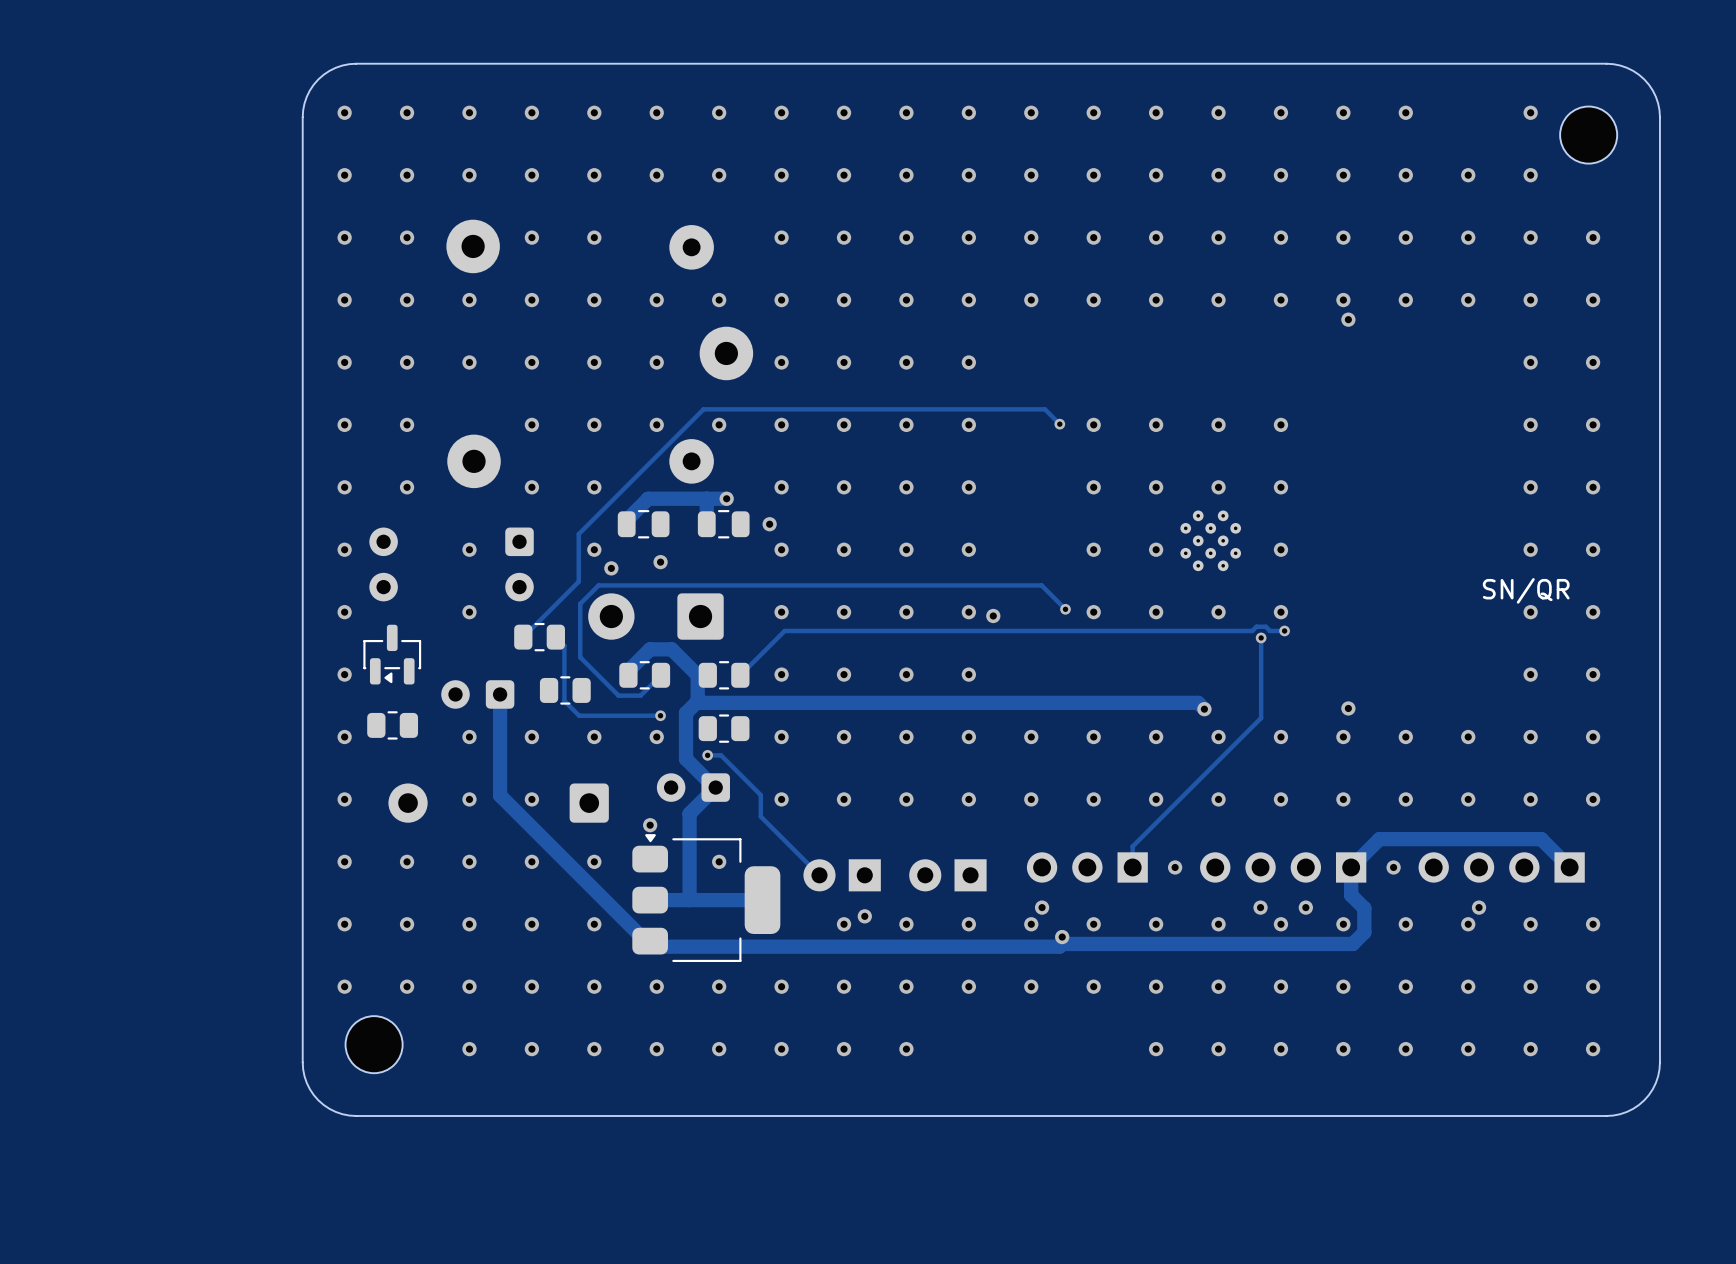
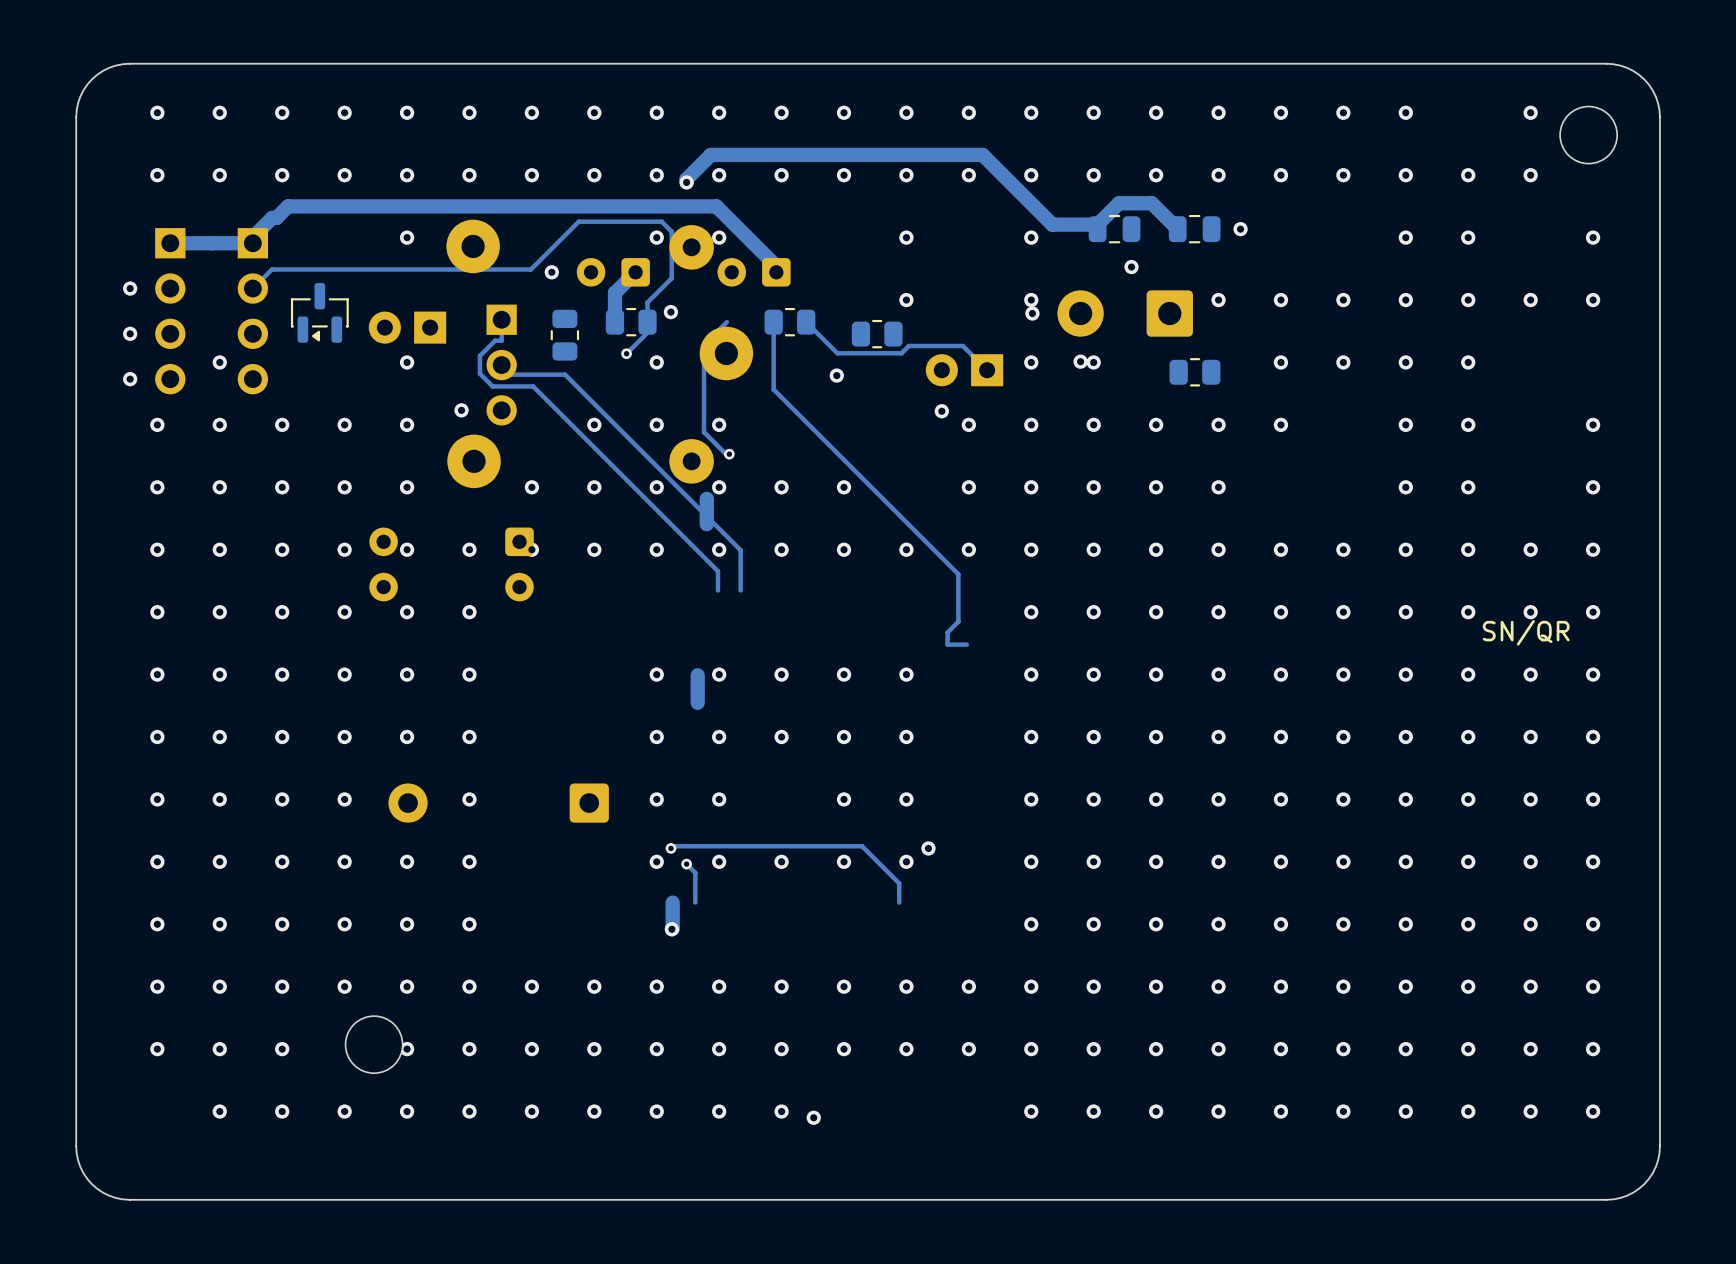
board edge: (356, 63) (335, 67) (318, 79) (306, 96) (302, 117) (302, 1062) (304, 1076) (309, 1089) (323, 1104) (335, 1111) (356, 1116) (1606, 1116) (1626, 1111) (1644, 1100) (1655, 1082) (1659, 1062) -> (356, 63) (122, 64) (109, 67) (97, 74) (83, 90) (78, 103) (76, 117) (76, 1146) (80, 1166) (87, 1178) (97, 1188) (115, 1198) (129, 1199) (1613, 1199) (1626, 1195) (1639, 1188) (1648, 1178) (1655, 1166) (1659, 1146) (1659, 1062)
via: none -> (157, 112)
via: none -> (219, 112)
via: none -> (282, 112)
via: none -> (157, 175)
via: none -> (219, 175)
via: none -> (282, 175)
track: none -> (686, 182) (686, 179) (710, 154) (982, 154) (1052, 224) (1097, 224)
via: none -> (686, 182)
track: none -> (1097, 224) (1118, 203) (1151, 203) (1177, 229)
part: none -> (1114, 229)
part: none -> (1194, 229)
via: none -> (1240, 229)
via: (344, 237) -> none
via: (531, 237) -> none
via: (594, 237) -> none
via: none -> (656, 237)
via: none -> (719, 237)
via: (781, 237) -> none
via: (844, 237) -> none
via: (968, 237) -> none
via: (1093, 237) -> none
via: (1156, 237) -> none
via: (1218, 237) -> none
via: (1280, 237) -> none
via: (1343, 237) -> none
via: (1530, 237) -> none
track: none -> (246, 243) (272, 217) (276, 217) (288, 206) (716, 206) (776, 266) (776, 272)
track: none -> (252, 243) (170, 243)
via: none -> (1131, 267)
via: none -> (551, 272)
part: none -> (613, 272)
track: none -> (635, 272) (614, 292) (614, 322)
part: none -> (754, 272)
via: none -> (130, 288)
track: none -> (252, 288) (271, 269) (530, 269) (578, 221) (661, 221) (671, 231) (671, 278) (647, 302) (647, 332) (626, 353)
via: (344, 300) -> none
via: (407, 300) -> none
via: (469, 300) -> none
via: (531, 300) -> none
via: (594, 300) -> none
via position: (656, 300) -> (670, 312)
via: (719, 300) -> none
via: (781, 300) -> none
via: (844, 300) -> none
via: (968, 300) -> none
via: (1093, 300) -> none
via: (1156, 300) -> none
part: none -> (170, 311)
part: none -> (252, 311)
via: none -> (1032, 313)
part: none -> (1125, 313)
track: none -> (501, 319) (501, 340) (495, 340) (479, 355) (479, 373) (492, 386) (533, 386) (718, 571) (718, 590)
via: (1348, 319) -> none
part: none -> (631, 322)
track: none -> (726, 322) (704, 345) (704, 432) (726, 454) (729, 454)
track: none -> (773, 322) (773, 389) (958, 574) (958, 621) (947, 632) (947, 644) (966, 644)
part: none -> (789, 322)
track: none -> (806, 322) (837, 353) (901, 353) (908, 345) (962, 345) (987, 370)
part: none -> (407, 327)
via: none -> (130, 333)
part: none -> (877, 334)
part: none -> (564, 335)
via: none -> (626, 353)
via: none -> (1080, 361)
via: none -> (219, 362)
via: (344, 362) -> none
via: (469, 362) -> none
via: (531, 362) -> none
via: (594, 362) -> none
via: (781, 362) -> none
via position: (844, 362) -> (836, 375)
via: (906, 362) -> none
via: (968, 362) -> none
via: none -> (1031, 362)
via: none -> (1093, 362)
via: none -> (1280, 362)
via: none -> (1343, 362)
via: none -> (1405, 362)
via: none -> (1468, 362)
via: (1530, 362) -> none
via: (1593, 362) -> none
track: none -> (501, 365) (511, 374) (565, 374) (740, 550) (740, 590)
part: none -> (501, 365)
part: none -> (964, 370)
part: none -> (1195, 372)
via: none -> (130, 379)
via: none -> (461, 410)
via: none -> (941, 411)
via: none -> (157, 424)
via: none -> (219, 424)
via: none -> (282, 424)
via: (531, 424) -> none
via: (781, 424) -> none
via: (844, 424) -> none
via: (906, 424) -> none
via: none -> (1031, 424)
track: (1059, 424) (1044, 409) (703, 409) (578, 534) (578, 581) (523, 637) -> none
via: (1059, 424) -> none
via: none -> (1405, 424)
via: none -> (1468, 424)
via: (1530, 424) -> none
via: none -> (729, 454)
via: none -> (157, 487)
via: none -> (219, 487)
via: none -> (282, 487)
via: none -> (656, 487)
via: (906, 487) -> none
via: none -> (1031, 487)
via: (1280, 487) -> none
via: none -> (1405, 487)
via: none -> (1468, 487)
via: (1530, 487) -> none
track: (726, 498) (648, 498) (626, 520) (626, 524) -> none
via position: (726, 498) -> (719, 487)
part: (643, 524) -> none
part: (723, 524) -> none
via: (769, 524) -> none
part: (1210, 540) -> none
via: none -> (157, 549)
via: none -> (219, 549)
via: none -> (282, 549)
via: none -> (407, 549)
via: none -> (531, 549)
via: none -> (719, 549)
via: none -> (1031, 549)
via: none -> (1218, 549)
via: none -> (1343, 549)
via: none -> (1405, 549)
via: none -> (1468, 549)
via position: (660, 562) -> (656, 549)
via: (611, 568) -> none
text position: SN/QR (1526, 590) -> SN/QR (1526, 632)
track: (1065, 609) (1041, 585) (598, 585) (580, 603) (580, 657) (618, 695) (640, 695) (660, 675) -> none
via: (1065, 609) -> none
via: none -> (157, 612)
via: none -> (219, 612)
via: none -> (282, 612)
via: none -> (407, 612)
via: (781, 612) -> none
via: (844, 612) -> none
via: (906, 612) -> none
via: (968, 612) -> none
via: none -> (1031, 612)
via: none -> (1343, 612)
via: none -> (1405, 612)
via: none -> (1468, 612)
via: (993, 615) -> none
part: (655, 616) -> none
track: (1284, 630) (1269, 630) (1265, 626) (1256, 626) (1252, 630) (784, 630) (740, 675) -> none
via: (1284, 630) -> none
part: (539, 637) -> none
track: (555, 637) (564, 645) (564, 701) (579, 715) (660, 715) -> none
track: (1261, 637) (1261, 718) (1132, 846) (1132, 867) -> none
via: (1261, 637) -> none
part position: (392, 654) -> (319, 312)
via: none -> (157, 674)
via: none -> (219, 674)
via: none -> (282, 674)
via: none -> (407, 674)
via: none -> (469, 674)
via: none -> (656, 674)
via: none -> (719, 674)
via: (968, 674) -> none
via: none -> (1031, 674)
via: none -> (1093, 674)
via: none -> (1156, 674)
via: none -> (1218, 674)
via: none -> (1280, 674)
via: none -> (1343, 674)
via: none -> (1405, 674)
via: none -> (1468, 674)
part: (644, 675) -> none
track: (707, 675) (697, 675) (671, 649) (649, 649) (628, 670) (628, 675) -> none
part: (724, 675) -> none
part: (565, 690) -> none
part: (477, 694) -> none
track: (500, 694) (500, 795) (645, 941) (650, 941) (655, 946) (1059, 946) (1062, 943) -> none
via: (1348, 708) -> none
track: (1204, 709) (1198, 702) (696, 702) (686, 713) (686, 758) (715, 787) (689, 813) (689, 900) -> none
via: (1204, 709) -> none
via: (660, 715) -> none
part: (392, 725) -> none
part: (724, 728) -> none
via: none -> (157, 737)
via: none -> (219, 737)
via: none -> (282, 737)
via: none -> (407, 737)
via: (531, 737) -> none
via: (594, 737) -> none
via: none -> (719, 737)
via: (968, 737) -> none
track: (707, 755) (721, 755) (760, 795) (760, 816) (819, 875) -> none
via: (707, 755) -> none
part: (693, 787) -> none
via: none -> (157, 799)
via: none -> (219, 799)
via: none -> (282, 799)
via: (531, 799) -> none
via: none -> (656, 799)
via: none -> (719, 799)
via: (781, 799) -> none
via: (968, 799) -> none
via: (650, 825) -> none
track: none -> (671, 848) (673, 846) (862, 846) (899, 883) (899, 902)
via: none -> (671, 848)
via: none -> (928, 848)
via: none -> (157, 861)
via: none -> (219, 861)
via: none -> (282, 861)
via: (531, 861) -> none
via: (594, 861) -> none
via: none -> (656, 861)
via: none -> (781, 861)
via: none -> (844, 861)
via: none -> (906, 861)
via: none -> (1031, 861)
via: none -> (1093, 861)
via: none -> (1218, 861)
via: none -> (1280, 861)
via: none -> (1343, 861)
via: none -> (1468, 861)
via: none -> (1530, 861)
via: none -> (1593, 861)
track: none -> (686, 864) (695, 872) (695, 902)
via: none -> (686, 864)
part: (1087, 867) -> none
via position: (1175, 867) -> (1156, 861)
part: (1283, 867) -> none
via position: (1393, 867) -> (1405, 861)
part: (1501, 867) -> none
track: (1569, 867) (1541, 839) (1379, 839) (1351, 867) (1351, 895) (1364, 908) (1364, 932) (1352, 943) (1062, 943) -> none
part: (842, 875) -> none
part: (947, 875) -> none
part: (706, 898) -> none
track: (762, 900) (650, 900) -> none
track: none -> (672, 902) (672, 928)
via: (1042, 907) -> none
via: (1260, 907) -> none
via: (1305, 907) -> none
via: (1479, 907) -> none
via: (864, 916) -> none
via: none -> (157, 924)
via: none -> (219, 924)
via: none -> (282, 924)
via: (531, 924) -> none
via: (594, 924) -> none
via: (844, 924) -> none
via: (906, 924) -> none
via: (968, 924) -> none
via: none -> (671, 929)
via: (1062, 937) -> none
via: none -> (157, 986)
via: none -> (219, 986)
via: none -> (282, 986)
via: none -> (157, 1049)
via: none -> (219, 1049)
via: none -> (282, 1049)
via: none -> (407, 1049)
via: none -> (968, 1049)
via: none -> (1031, 1049)
via: none -> (1093, 1049)
via: none -> (219, 1111)
via: none -> (282, 1111)
via: none -> (344, 1111)
via: none -> (407, 1111)
via: none -> (469, 1111)
via: none -> (531, 1111)
via: none -> (594, 1111)
via: none -> (656, 1111)
via: none -> (719, 1111)
via: none -> (781, 1111)
via: none -> (1031, 1111)
via: none -> (1093, 1111)
via: none -> (1156, 1111)
via: none -> (1218, 1111)
via: none -> (1280, 1111)
via: none -> (1343, 1111)
via: none -> (1405, 1111)
via: none -> (1468, 1111)
via: none -> (1530, 1111)
via: none -> (1593, 1111)
via: none -> (813, 1117)

